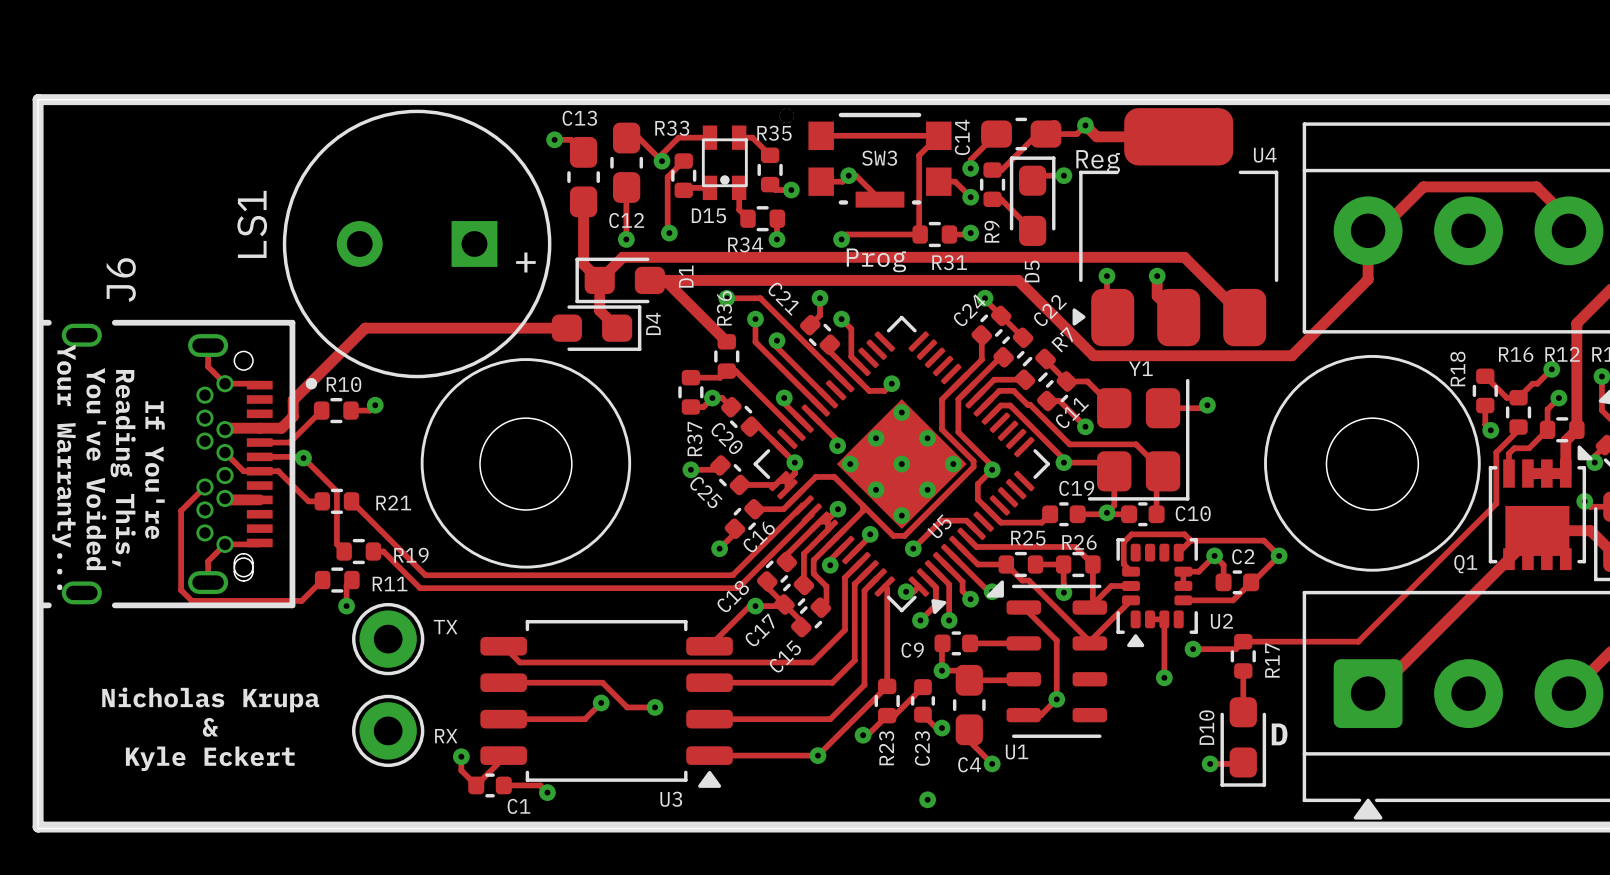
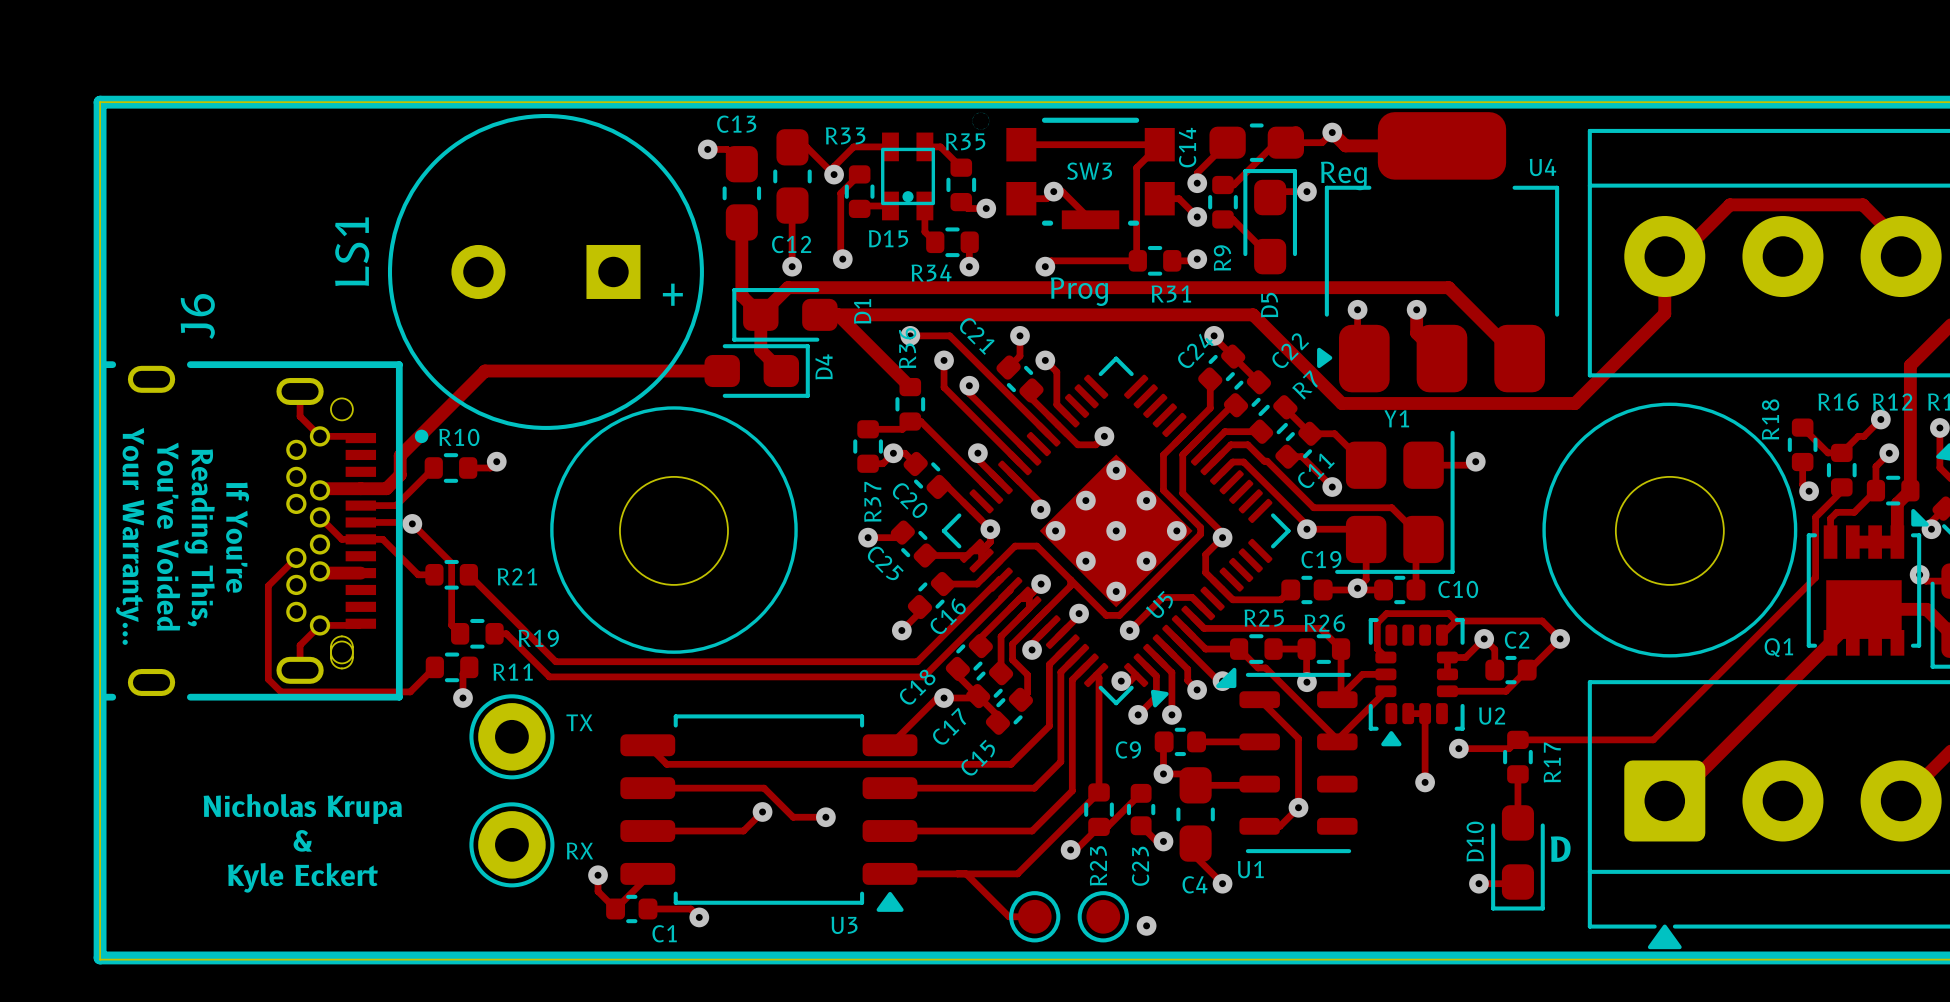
track: none -> (966, 873) (1008, 916) (1034, 916)
via: (817, 755) -> none
part: none -> (1034, 916)
part: none -> (1103, 916)

